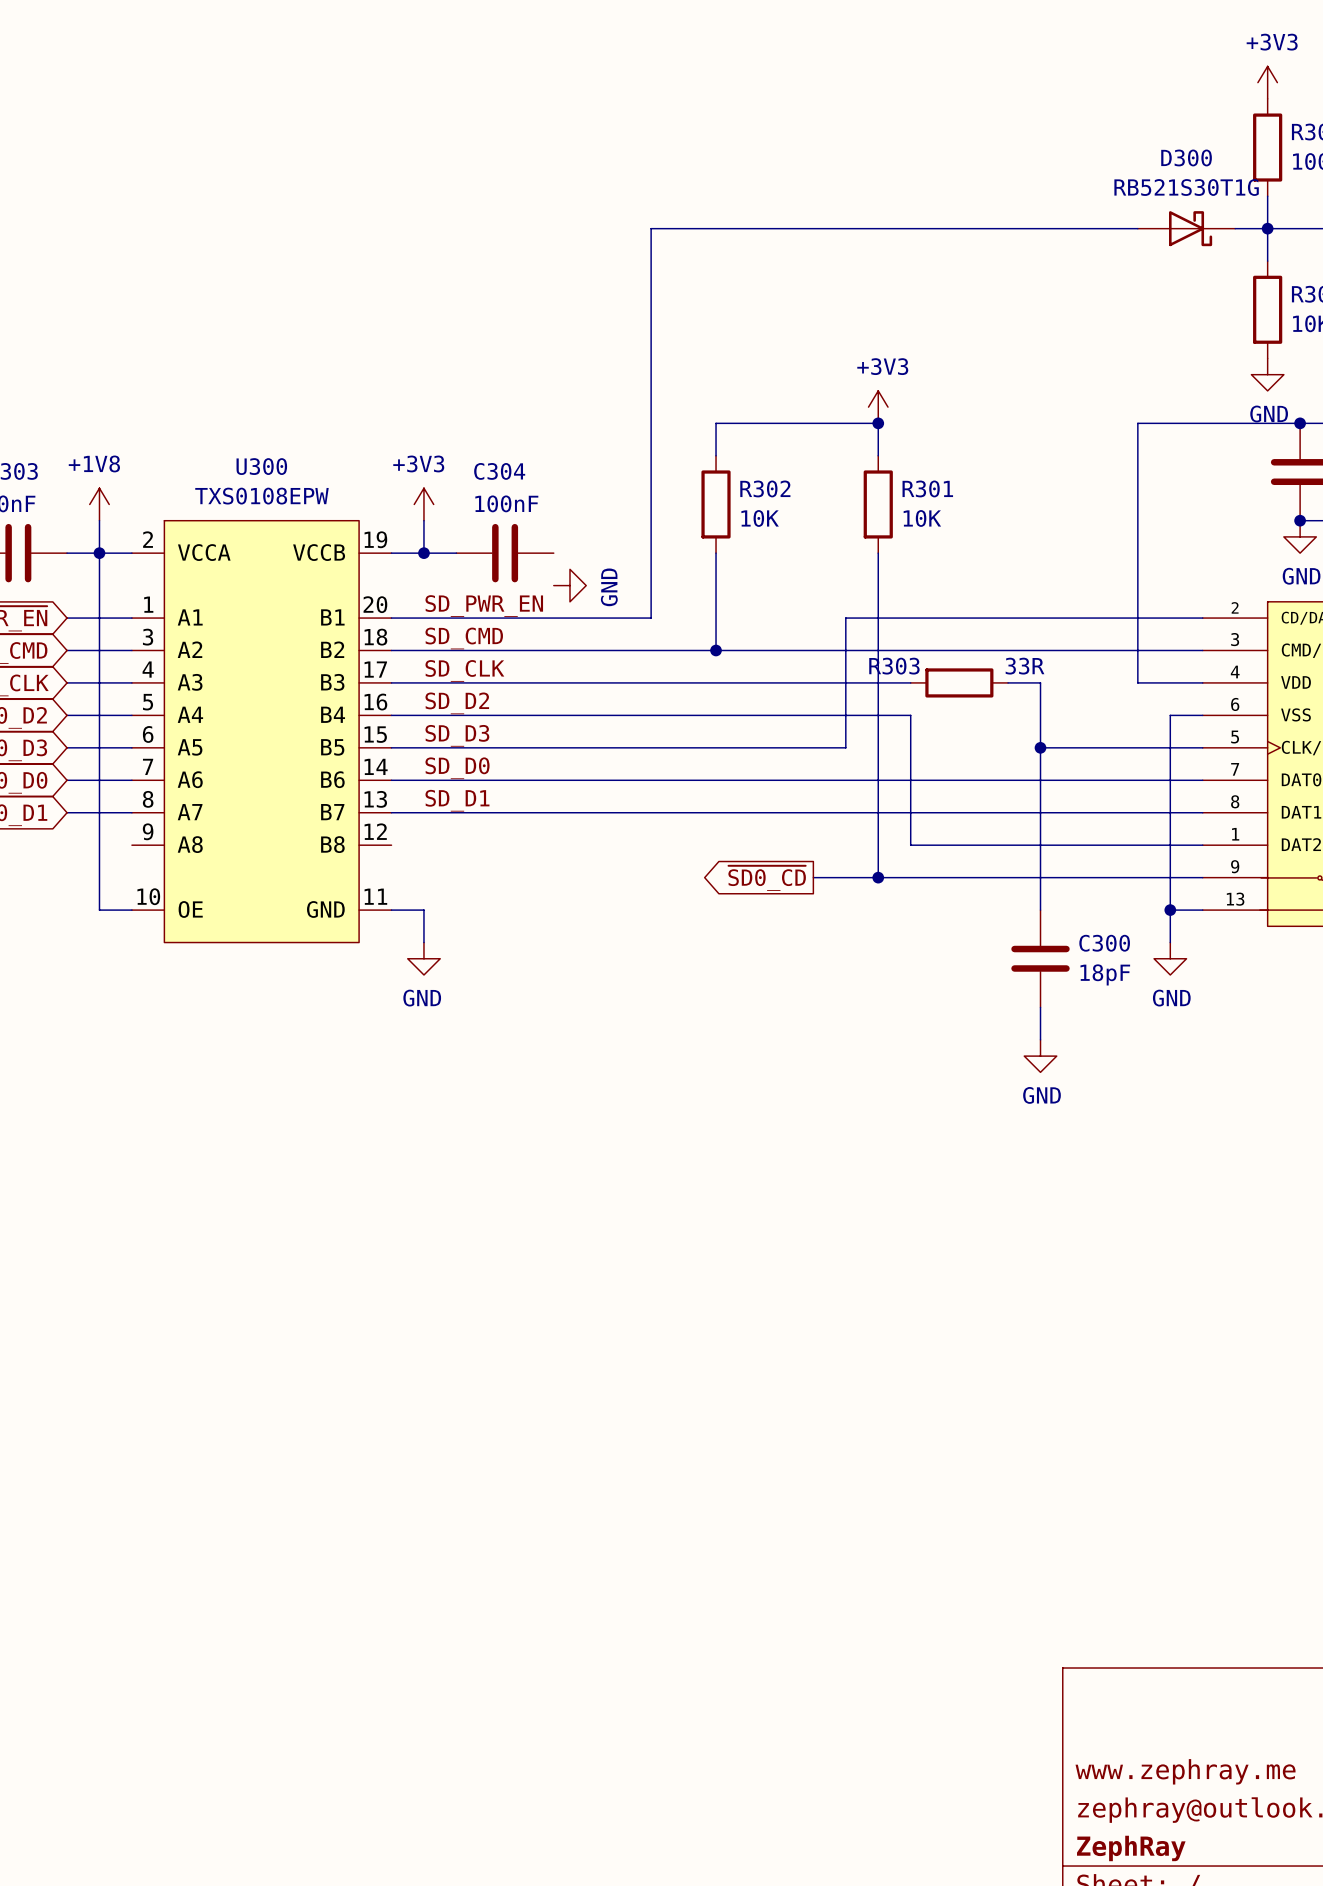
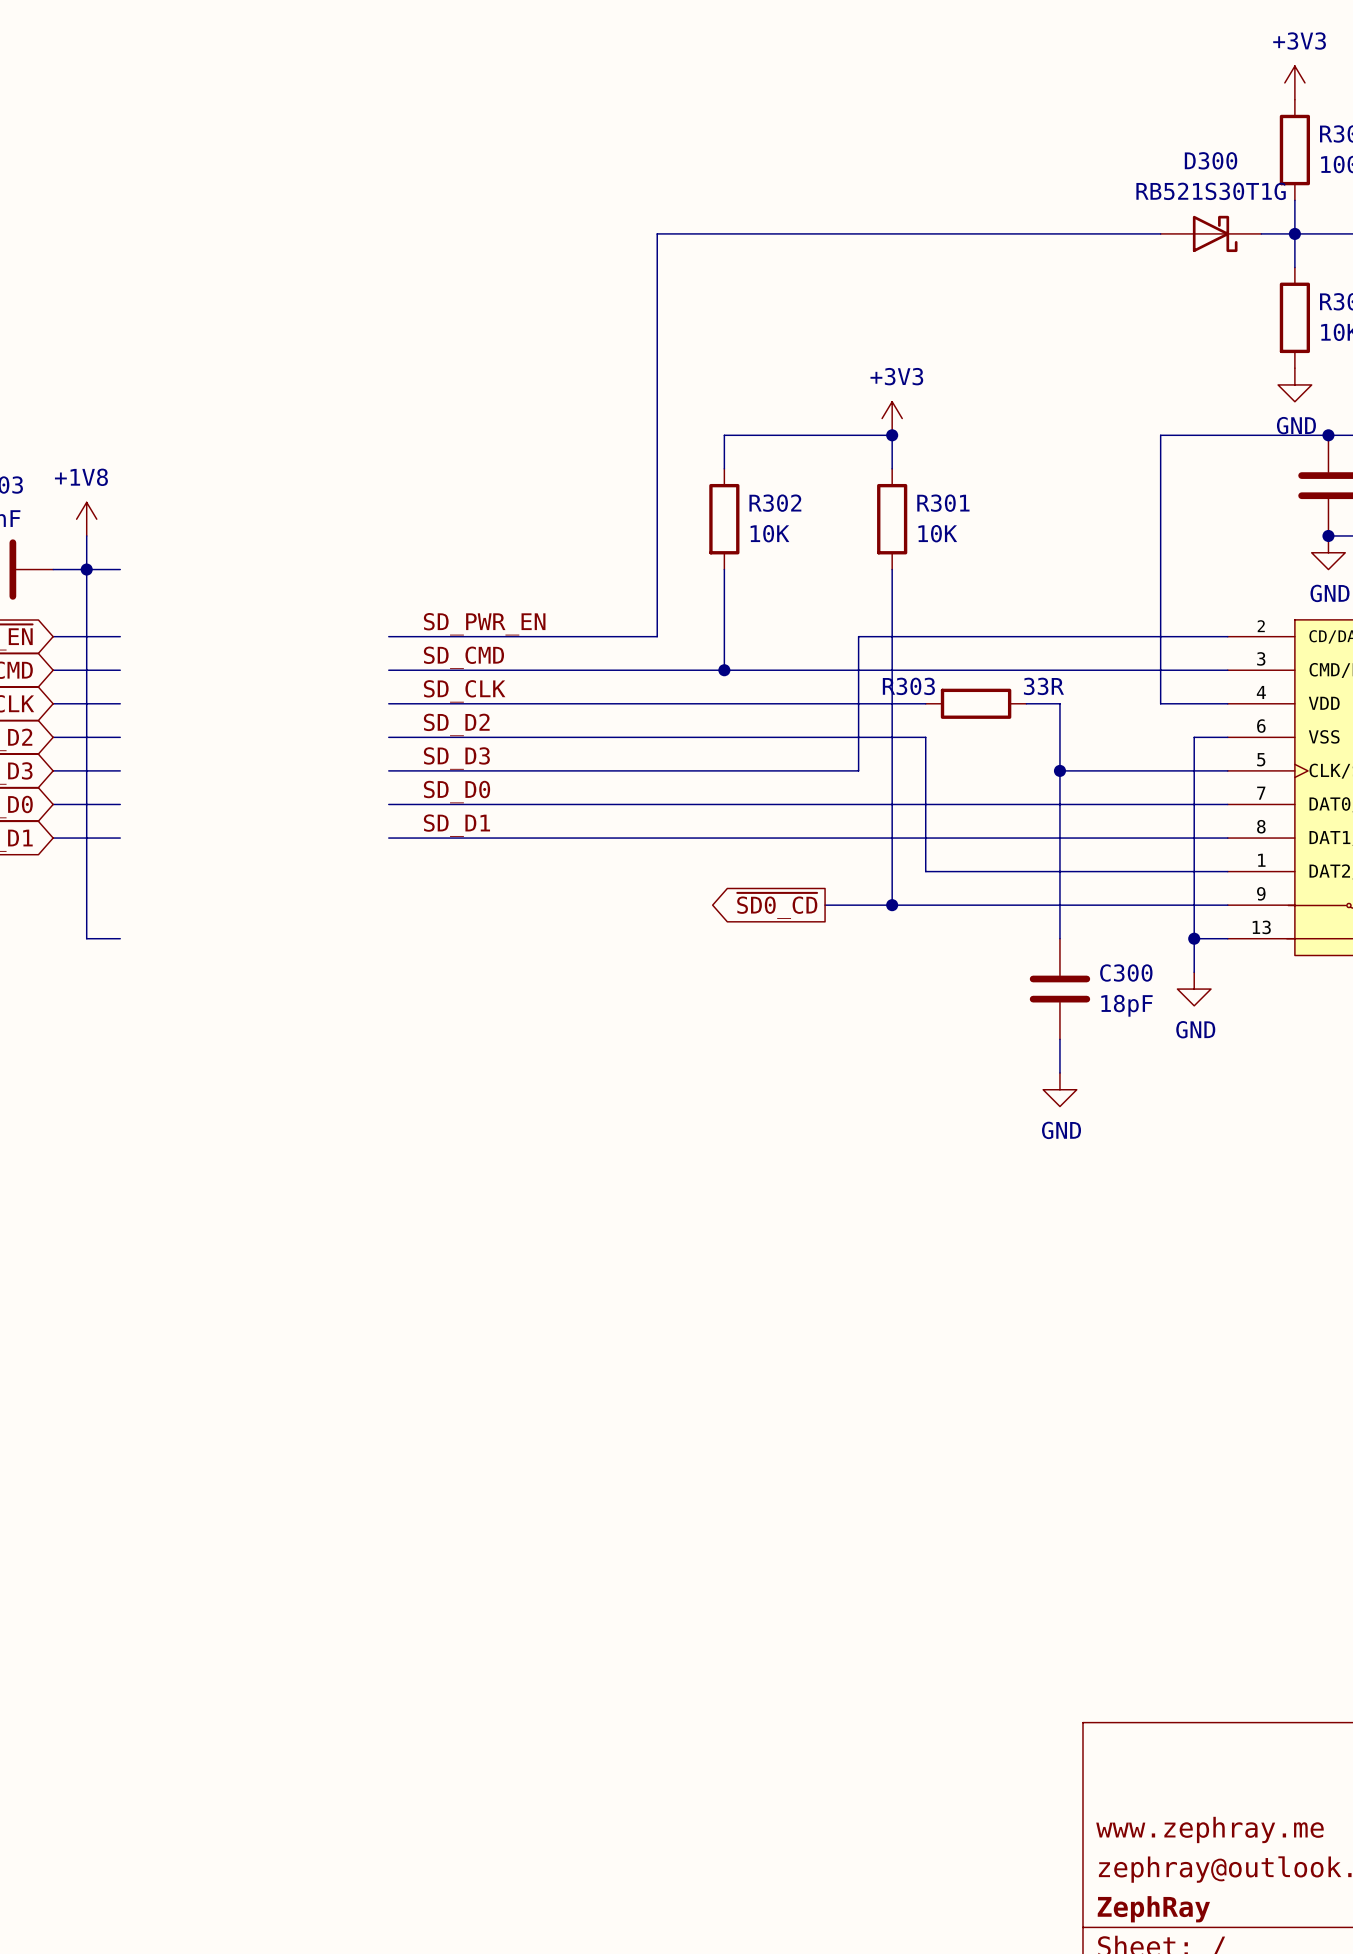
power symbol: +3V3 (423, 504) -> none
wire: (423, 520) (423, 553) -> none
wire: (391, 553) (456, 553) -> none
junction: (423, 553) -> none
C304: 100nF (505, 553) -> none
power symbol: GND (569, 585) -> none
U300: TXS0108EPW (261, 731) -> none
wire: (391, 910) (423, 910) (423, 942) -> none
power symbol: GND (423, 958) -> none

